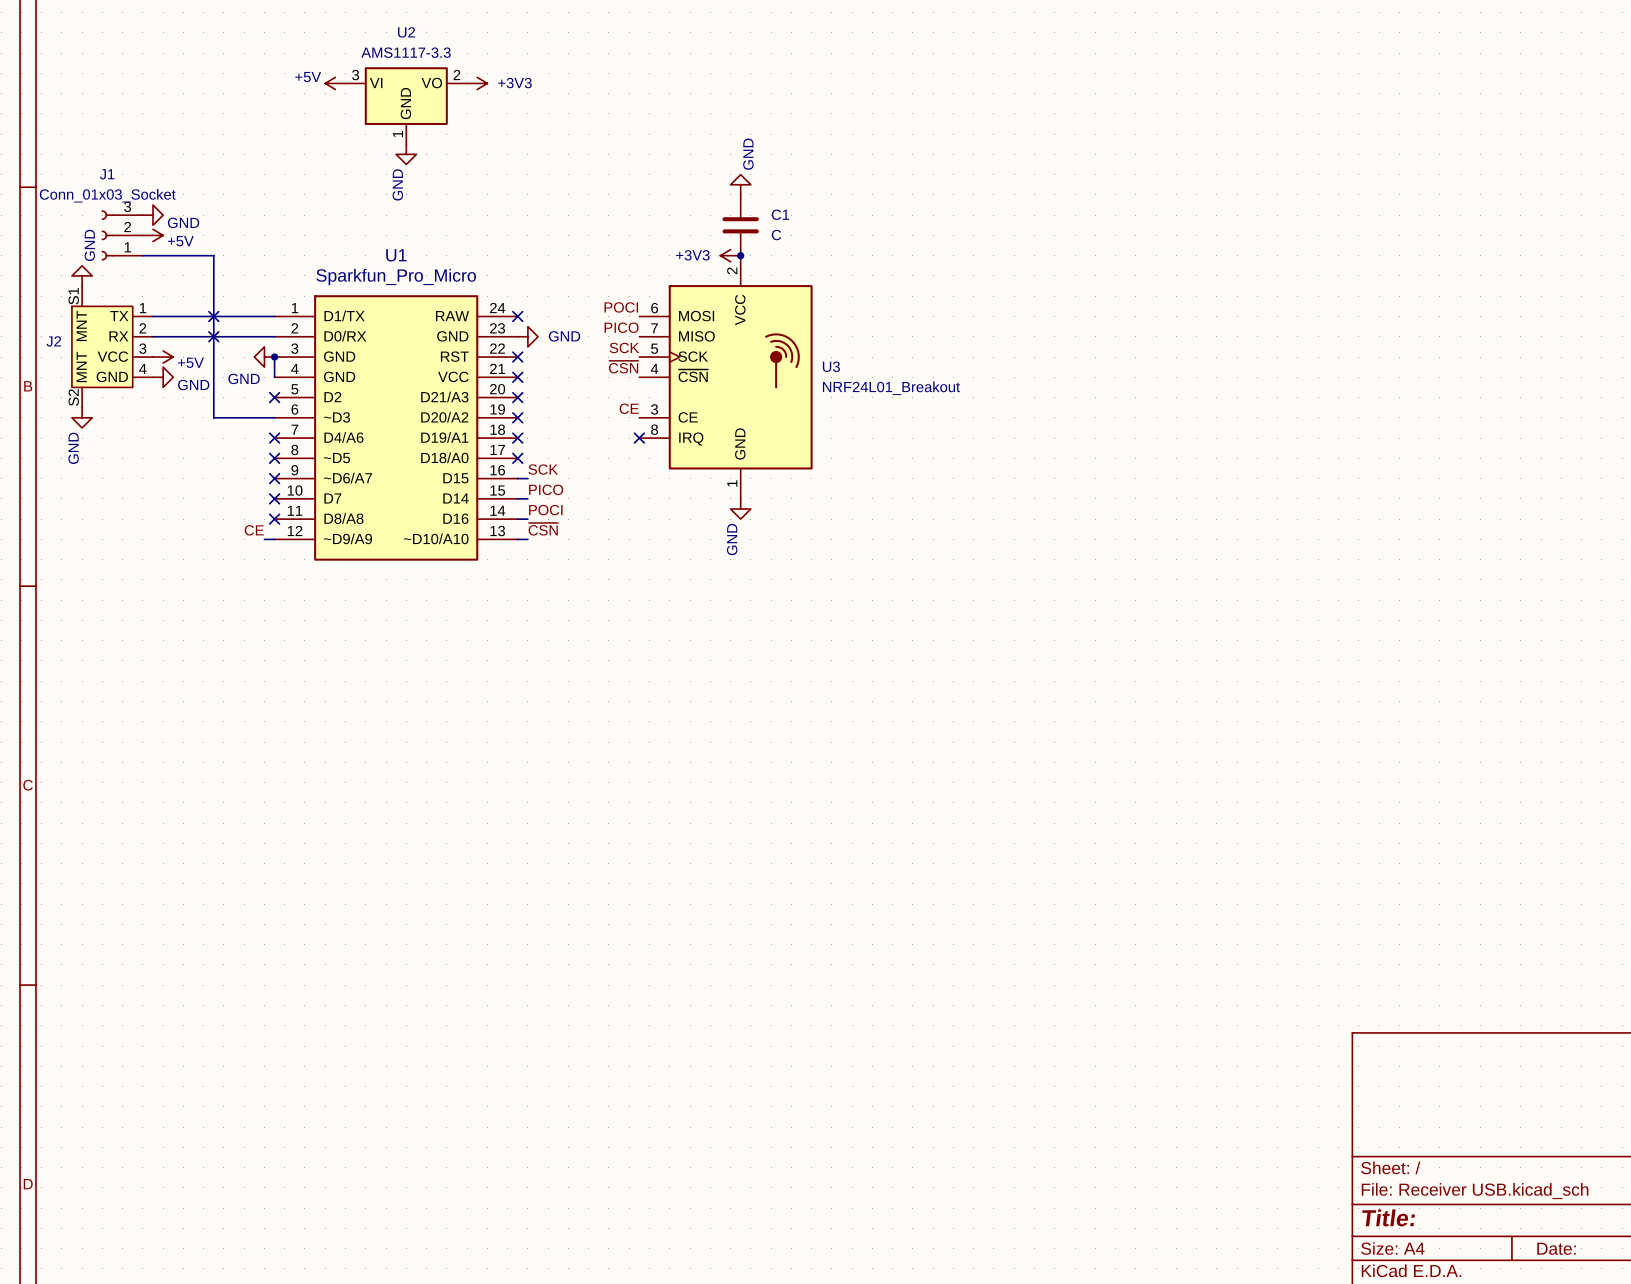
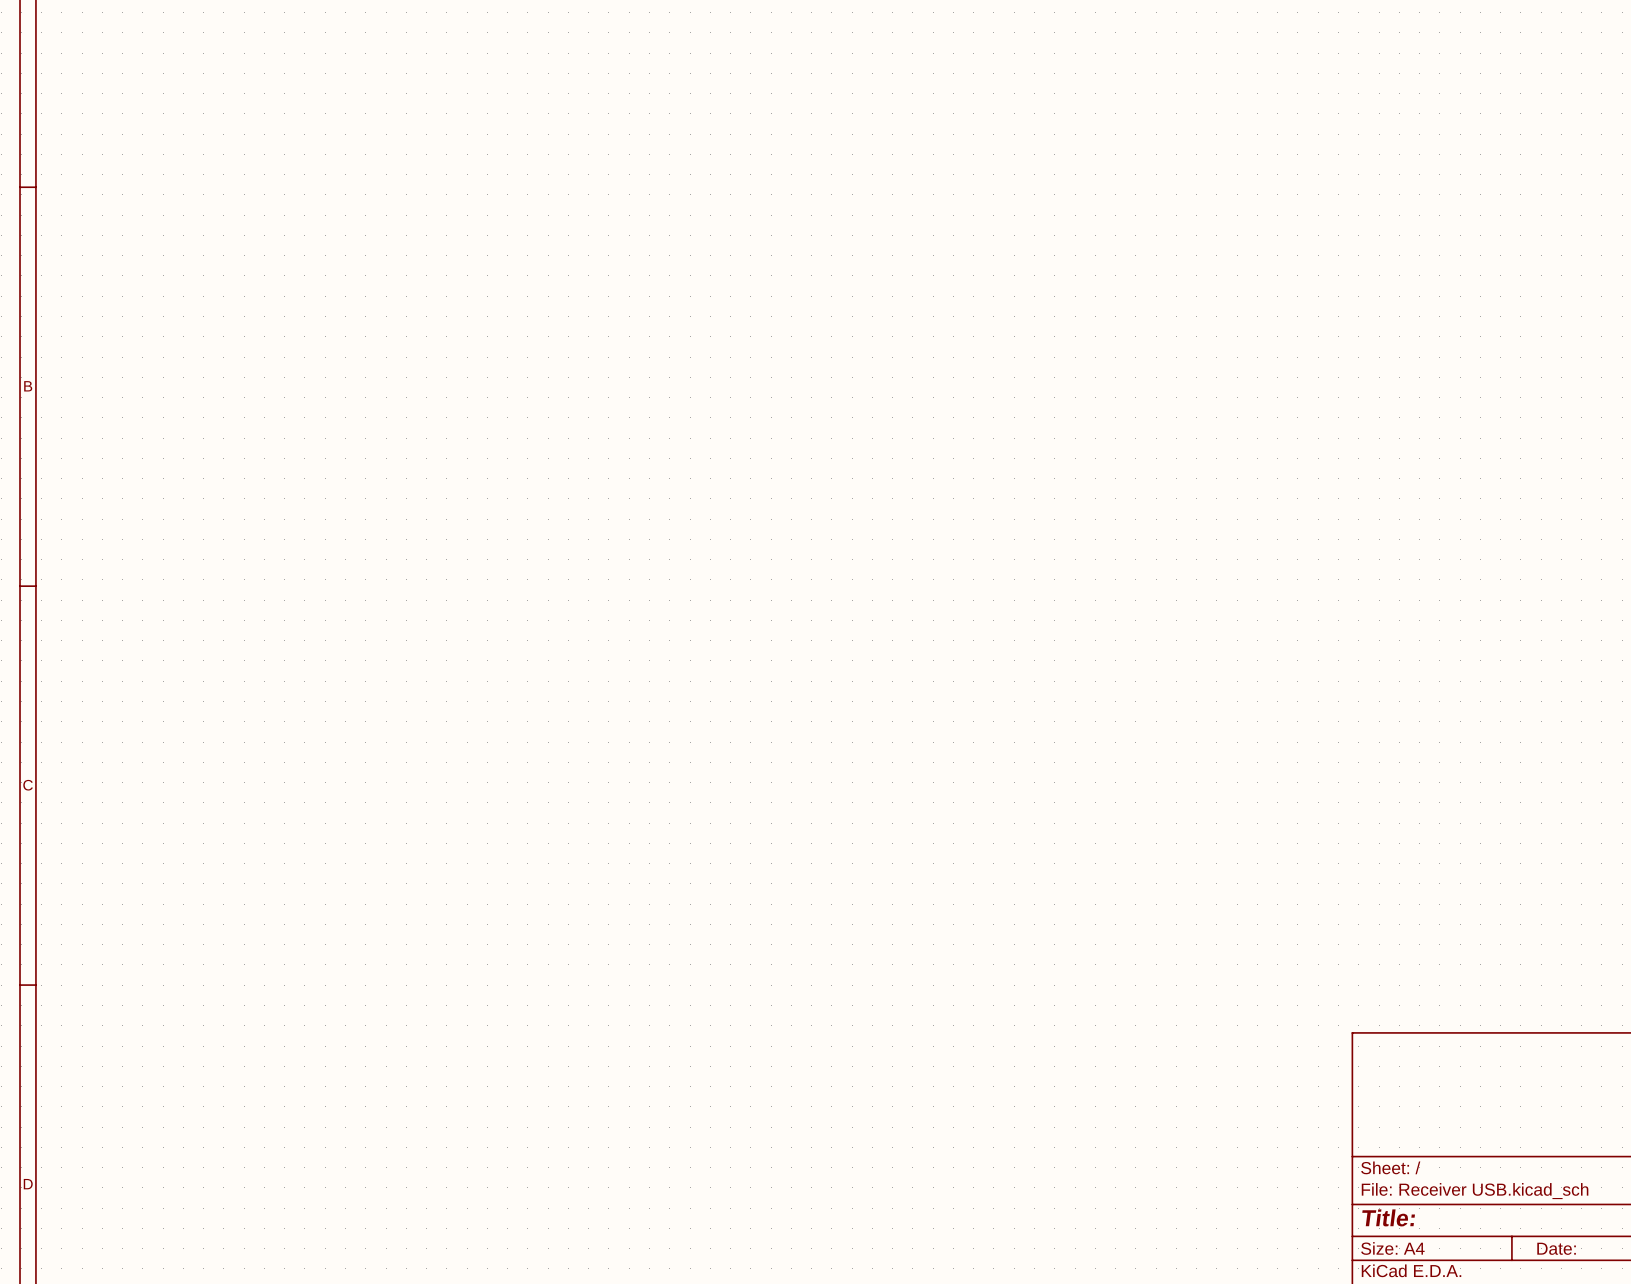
power symbol: +5V (335, 83) -> none
power symbol: +3V3 (477, 83) -> none
U2: AMS1117-3.3 (406, 105) -> none
power symbol: GND (406, 154) -> none
power symbol: GND (740, 184) -> none
power symbol: GND (153, 215) -> none
C1: C (740, 225) -> none
J1: Conn_01x03_Socket (122, 235) -> none
power symbol: +5V (153, 235) -> none
wire: (142, 255) (213, 255) (213, 417) (274, 417) -> none
power symbol: +3V3 (730, 255) -> none
junction: (740, 255) -> none
power symbol: GND (82, 275) -> none
label: POCI (621, 307) -> none
wire: (153, 316) (274, 316) -> none
no-connect mark: (213, 316) -> none
no-connect mark: (517, 316) -> none
label: PICO (621, 327) -> none
wire: (153, 336) (274, 336) -> none
no-connect mark: (213, 336) -> none
power symbol: GND (527, 336) -> none
J2: (112, 346) -> none
label: SCK (624, 347) -> none
power symbol: +5V (163, 357) -> none
power symbol: GND (264, 357) -> none
wire: (274, 357) (274, 377) -> none
junction: (274, 357) -> none
no-connect mark: (517, 357) -> none
label: ~{CSN} (623, 367) -> none
power symbol: GND (163, 377) -> none
no-connect mark: (517, 377) -> none
U3: NRF24L01_Breakout (725, 377) -> none
no-connect mark: (274, 397) -> none
no-connect mark: (517, 397) -> none
label: CE (629, 408) -> none
power symbol: GND (82, 417) -> none
no-connect mark: (517, 417) -> none
U1: Sparkfun_Pro_Micro (396, 427) -> none
no-connect mark: (274, 438) -> none
no-connect mark: (517, 438) -> none
no-connect mark: (639, 438) -> none
no-connect mark: (274, 458) -> none
no-connect mark: (517, 458) -> none
label: SCK (543, 469) -> none
no-connect mark: (274, 478) -> none
wire: (517, 478) (527, 478) -> none
label: PICO (546, 489) -> none
no-connect mark: (274, 498) -> none
wire: (517, 498) (527, 498) -> none
power symbol: GND (740, 509) -> none
label: POCI (545, 510) -> none
no-connect mark: (274, 519) -> none
wire: (517, 519) (527, 519) -> none
label: ~{CSN} (543, 529) -> none
label: CE (254, 530) -> none
wire: (264, 539) (274, 539) -> none
wire: (517, 539) (527, 539) -> none

